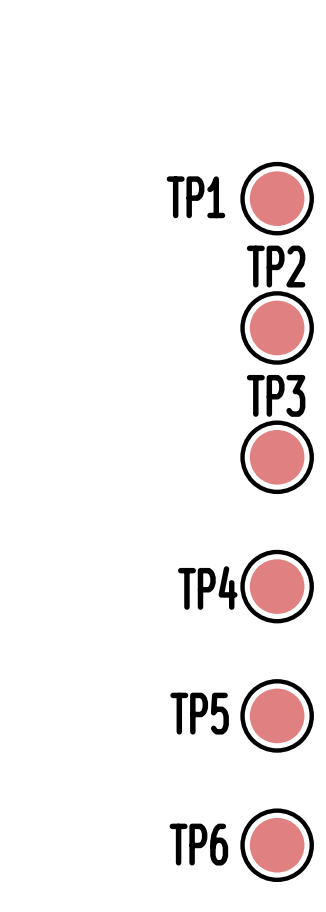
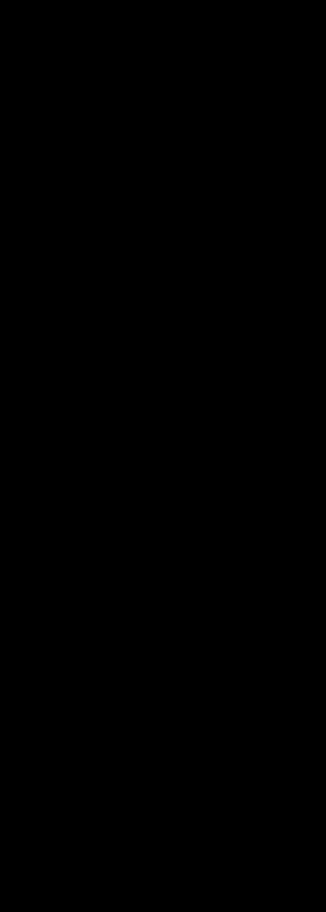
TP1: (277, 198) -> none
TP2: (277, 327) -> none
TP3: (277, 457) -> none
TP4: (277, 586) -> none
TP5: (277, 715) -> none
TP6: (277, 845) -> none

